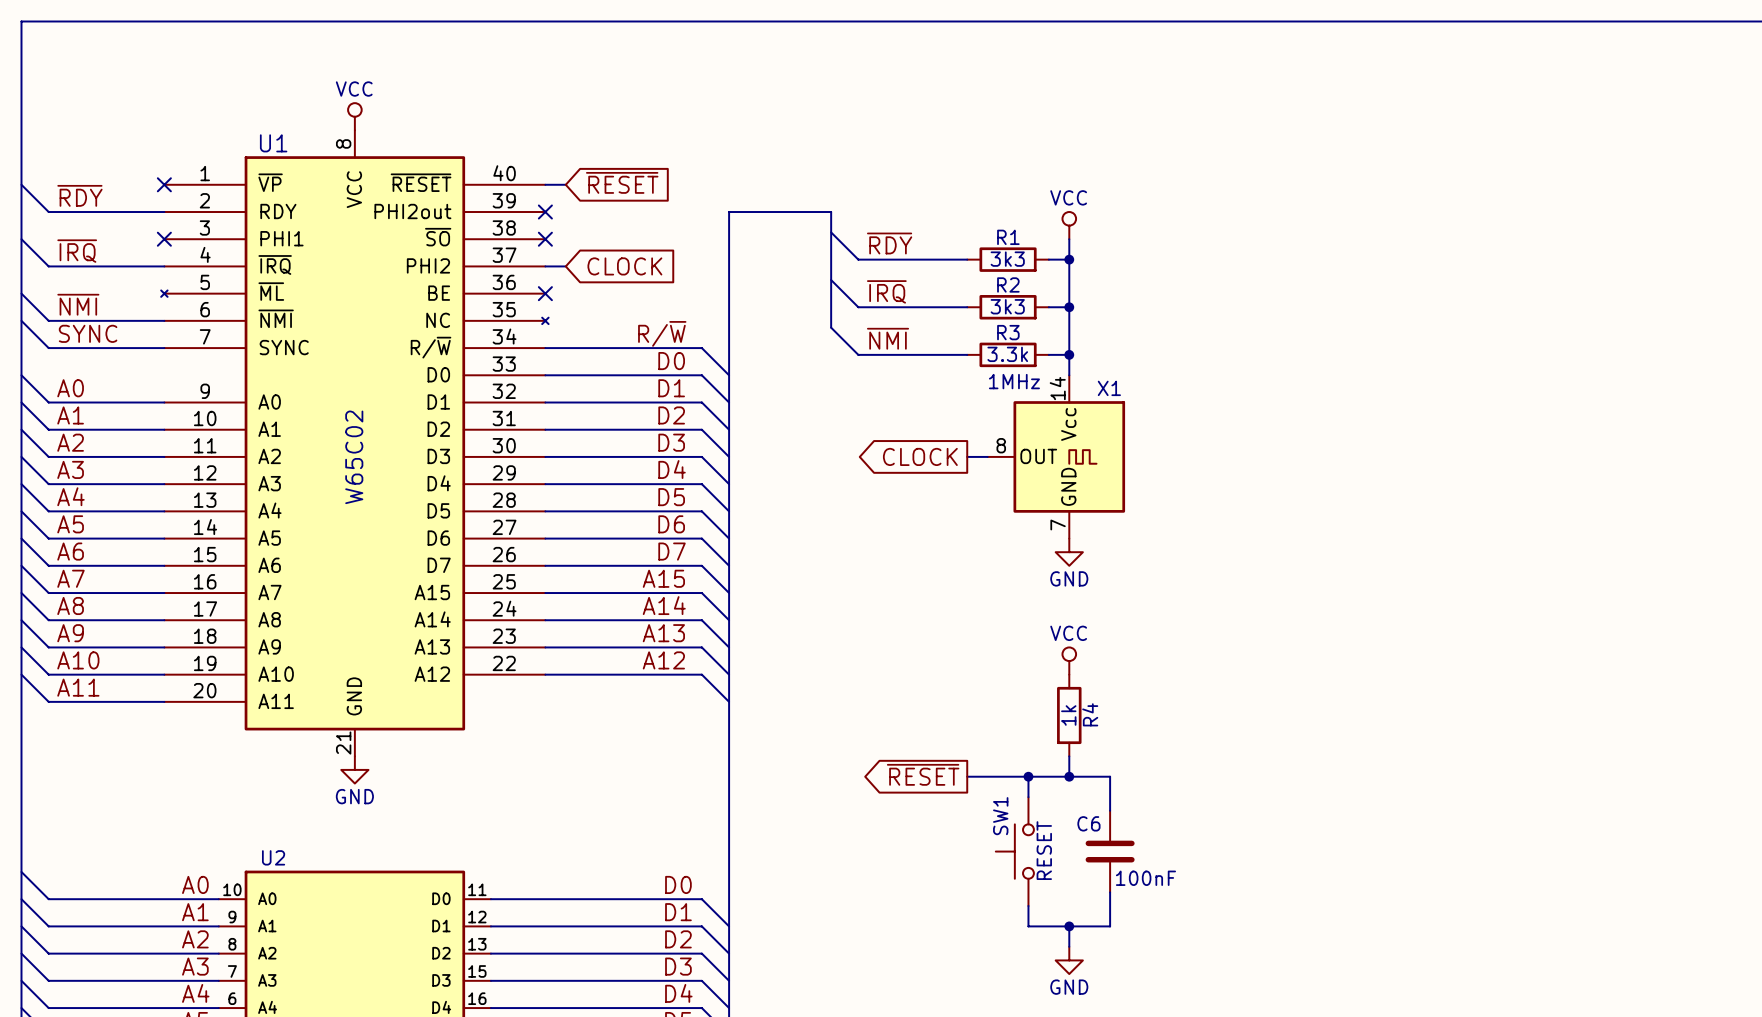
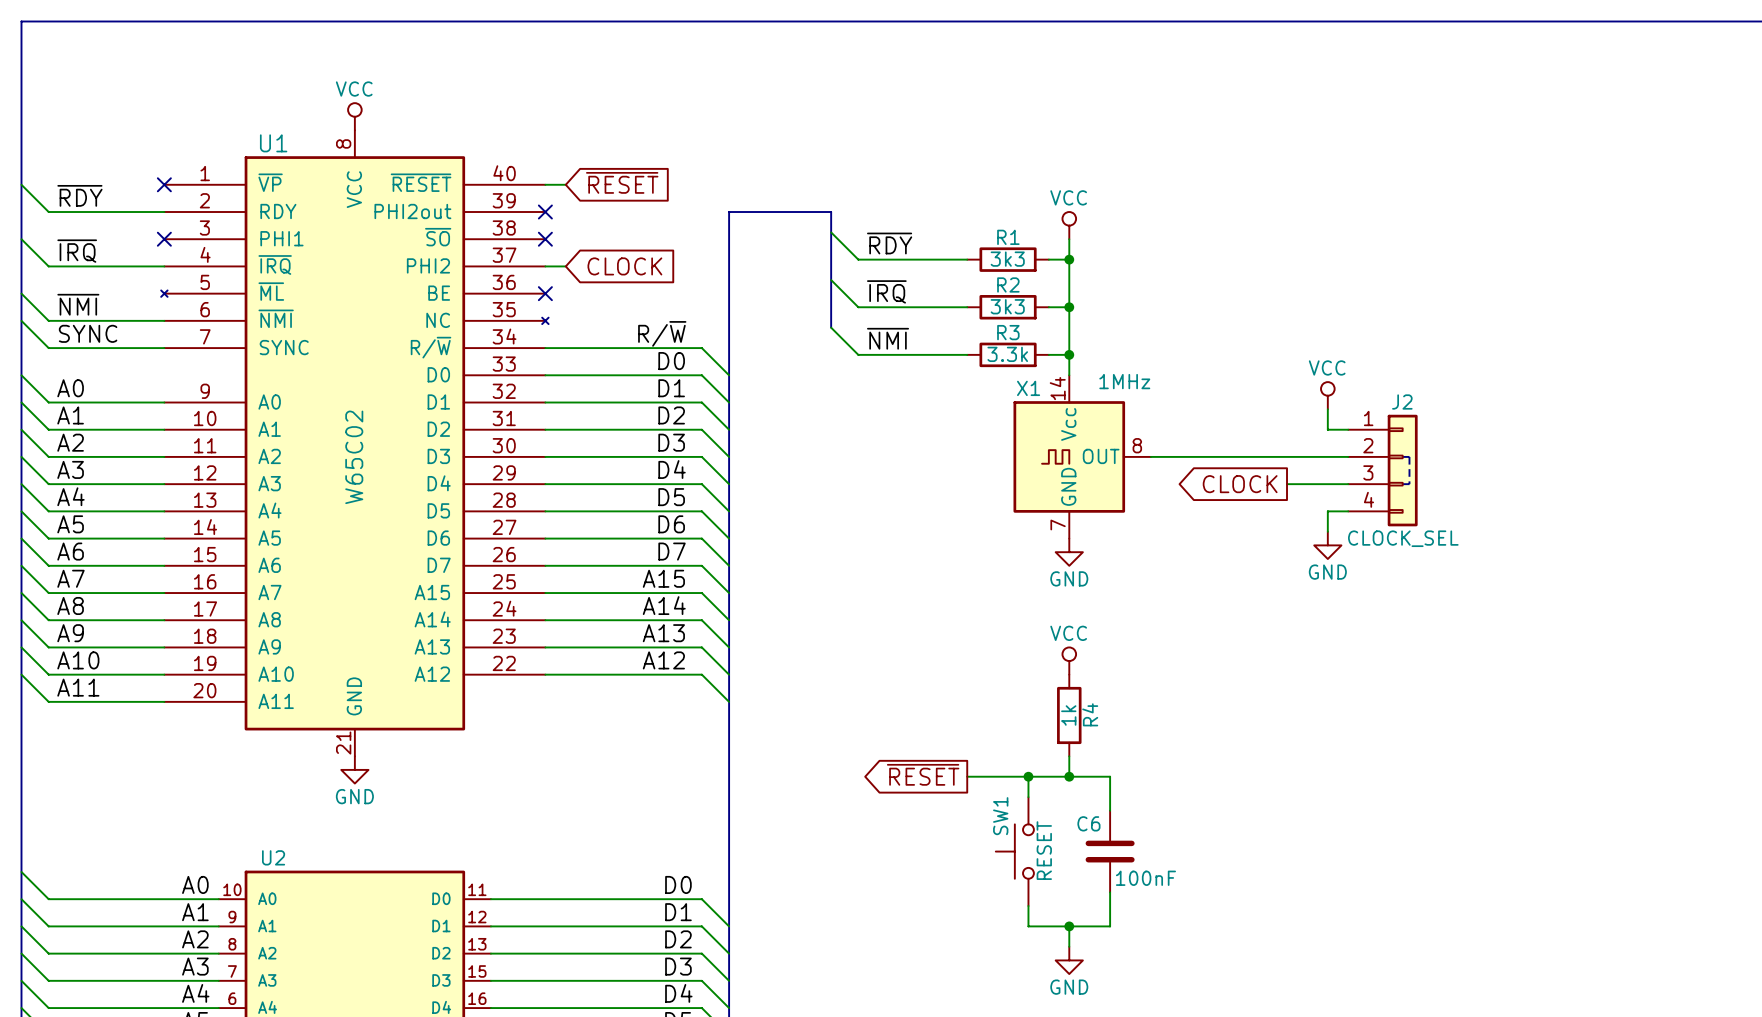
power symbol: none -> VCC (1327, 395)
wire: none -> (1327, 409) (1327, 429) (1348, 429)
global label: CLOCK (920, 456) -> none
wire: (967, 456) (987, 456) -> none
X1 flip: as is (1069, 456) -> left-right (1069, 456)
wire: none -> (1150, 456) (1348, 456)
line: none -> (1402, 456) (1409, 456) (1409, 484) (1402, 484)
J2: none -> CLOCK_SEL (1382, 470)
global label: none -> CLOCK (1240, 484)
wire: none -> (1287, 484) (1348, 484)
wire: none -> (1348, 511) (1327, 511) (1327, 531)
power symbol: none -> GND (1327, 545)

